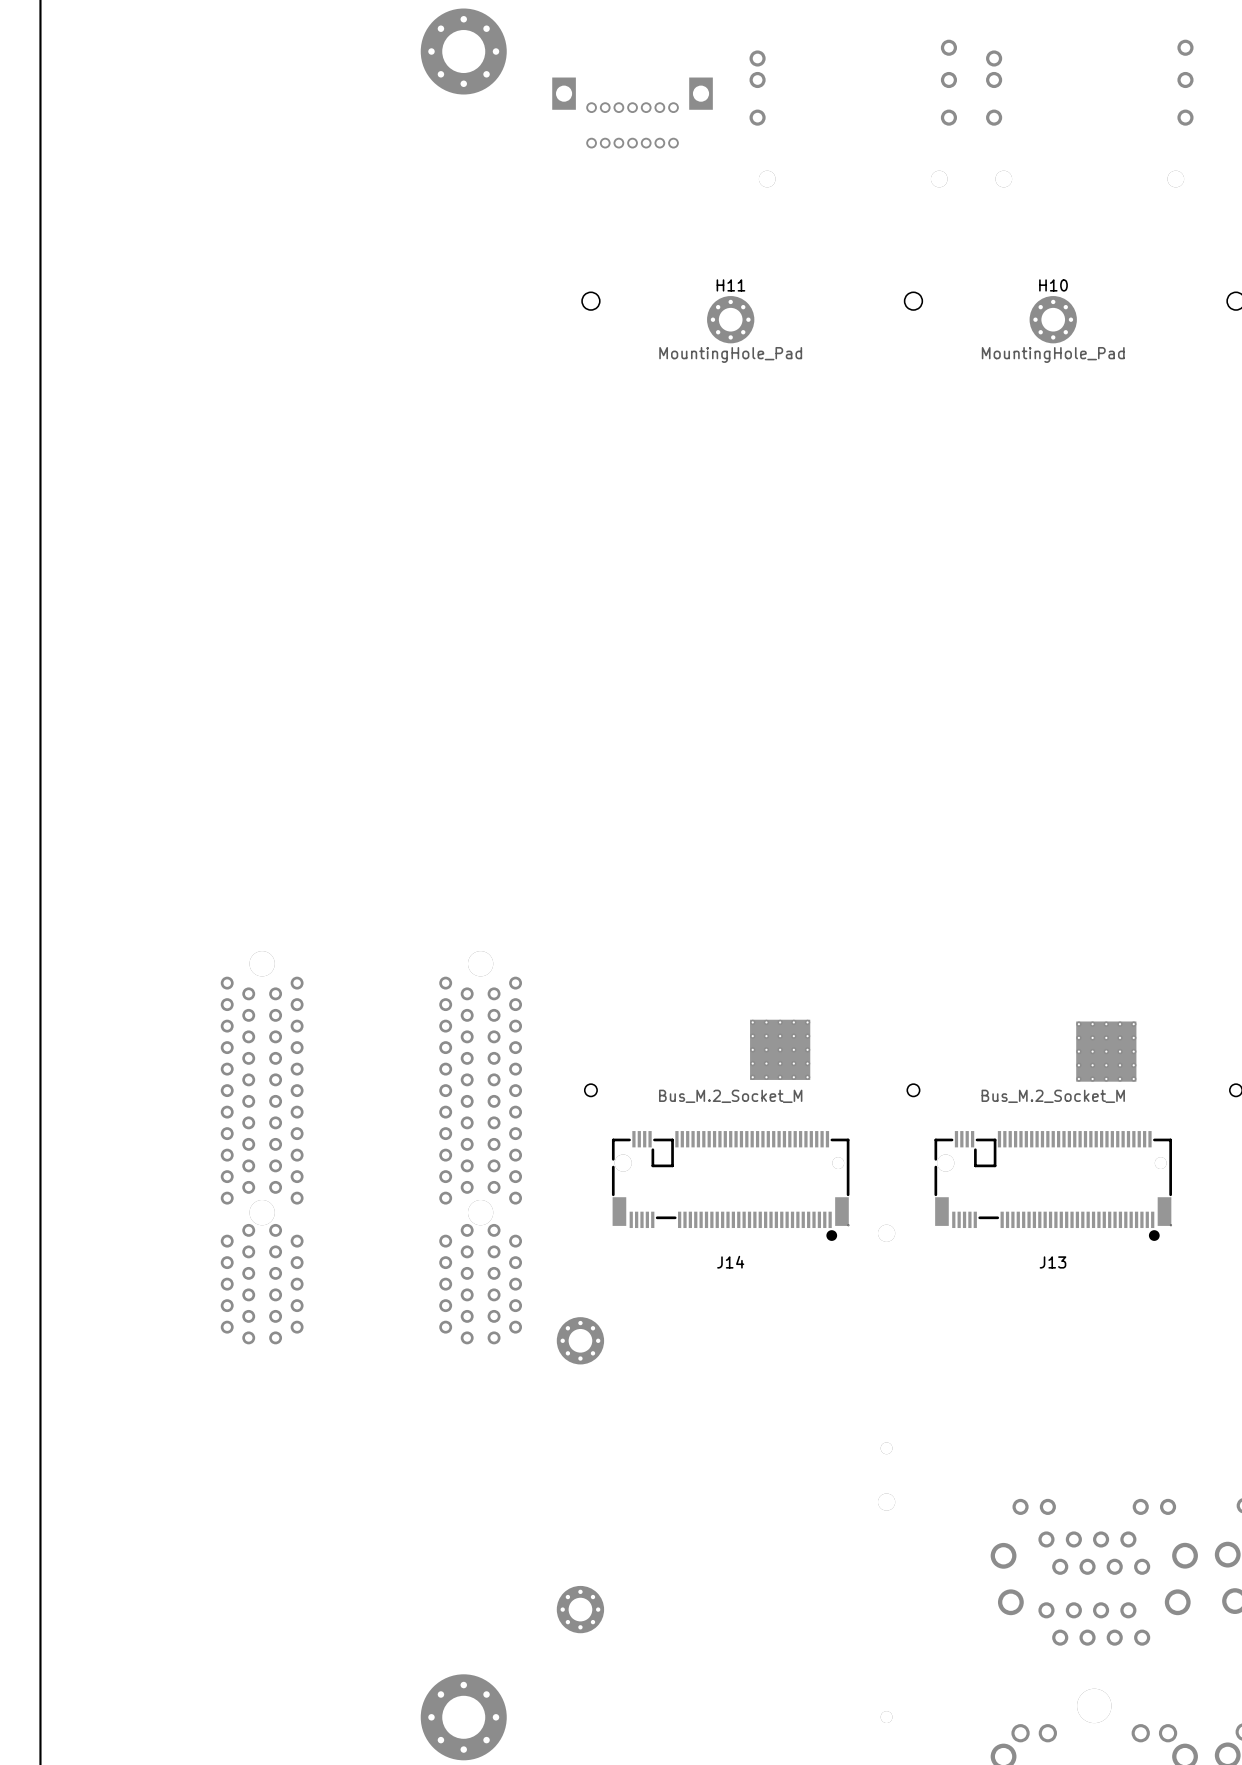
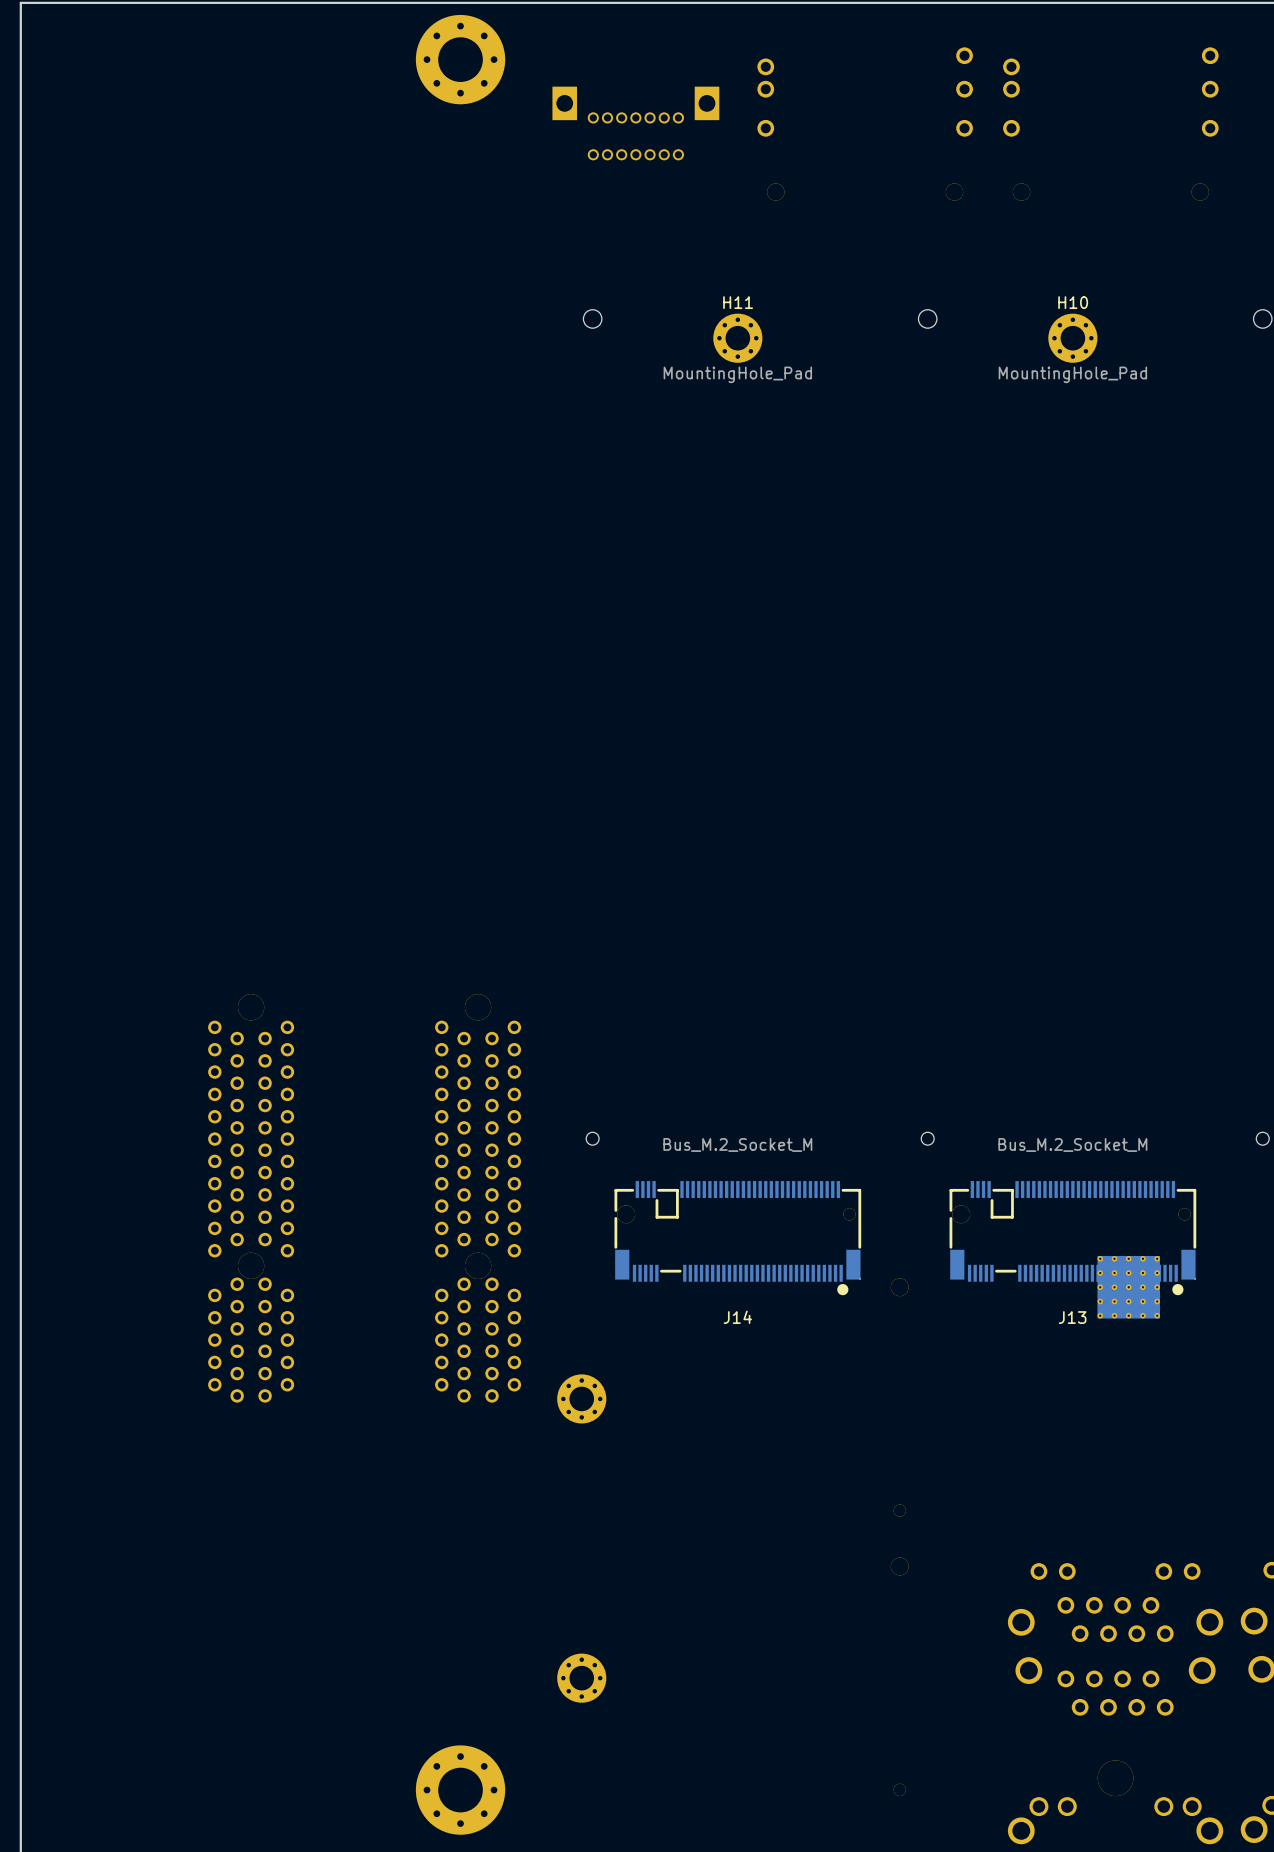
part: (780, 1049) -> none
part: (1106, 1051) -> none
part: none -> (1128, 1287)

